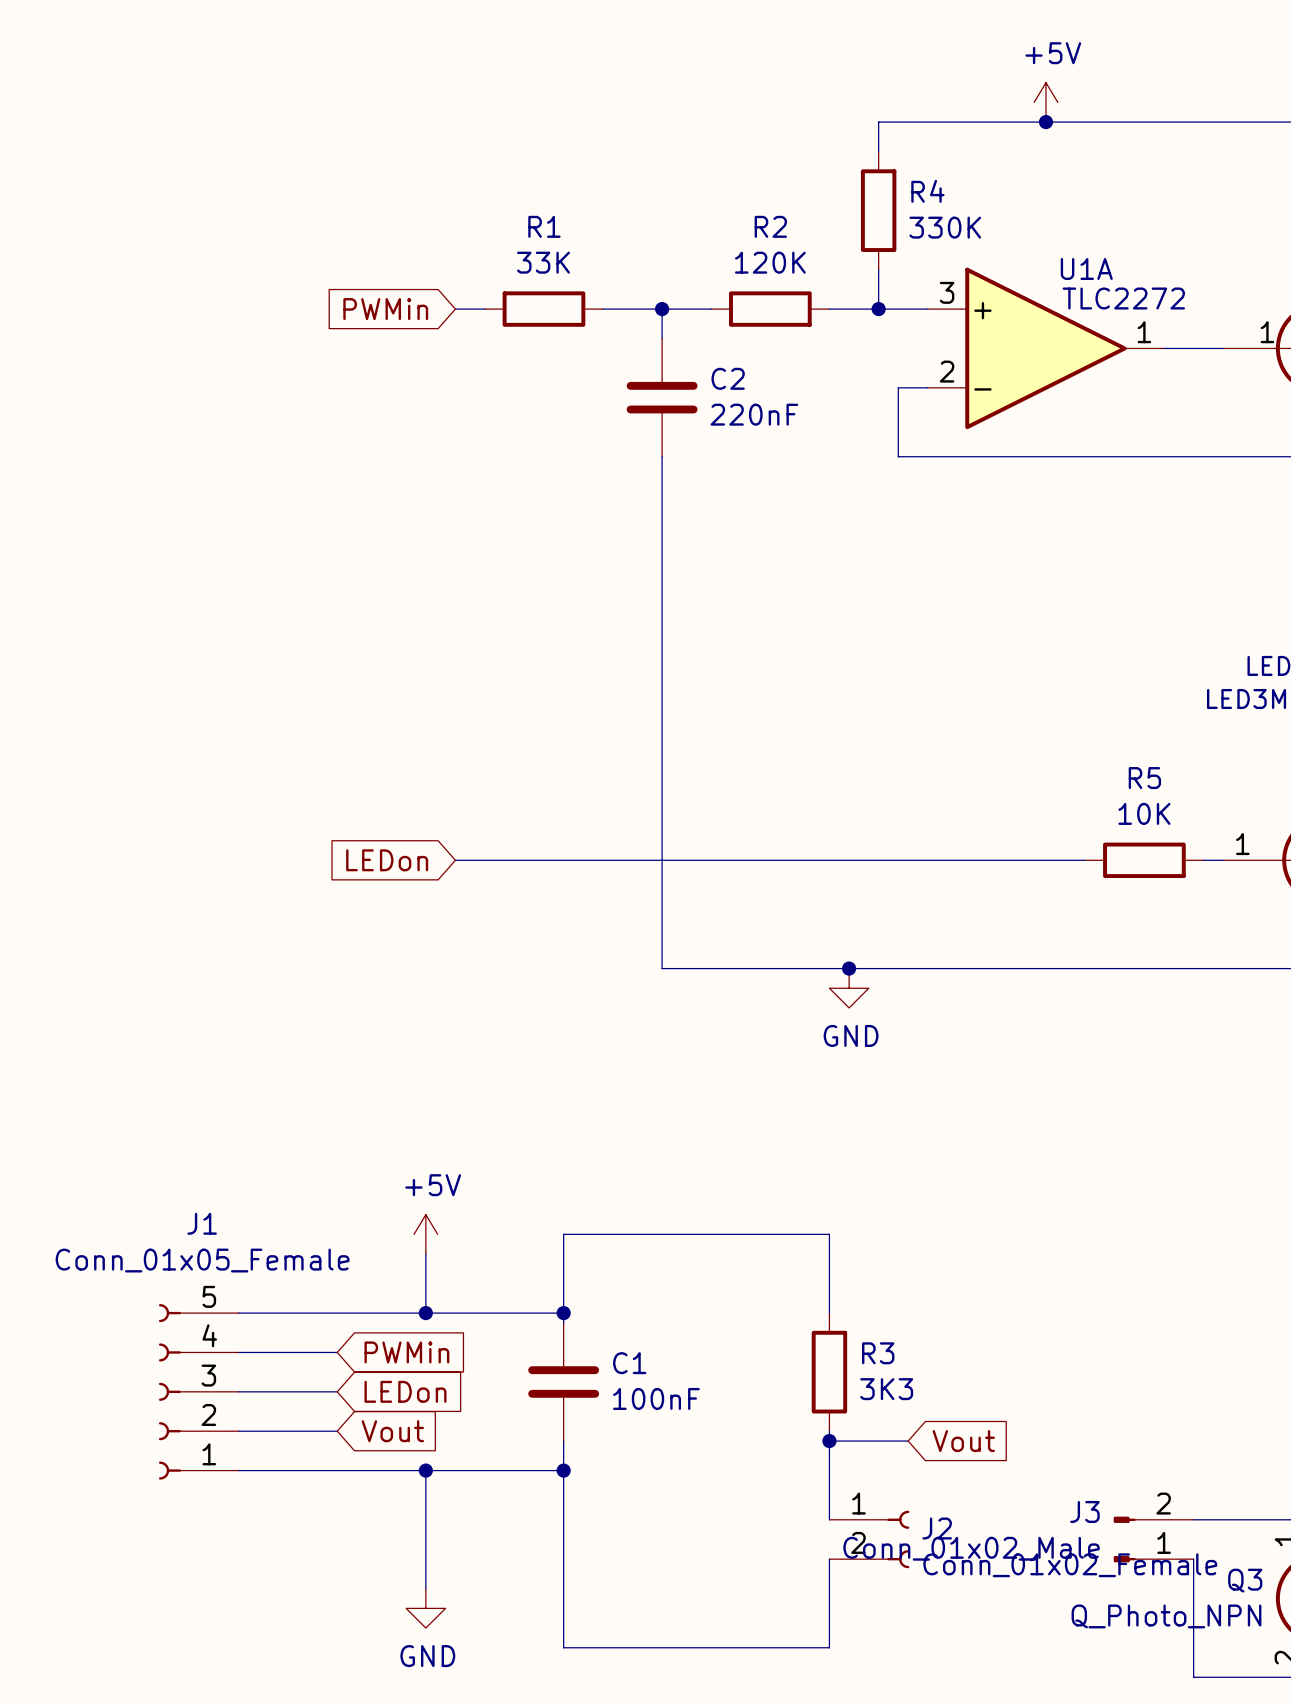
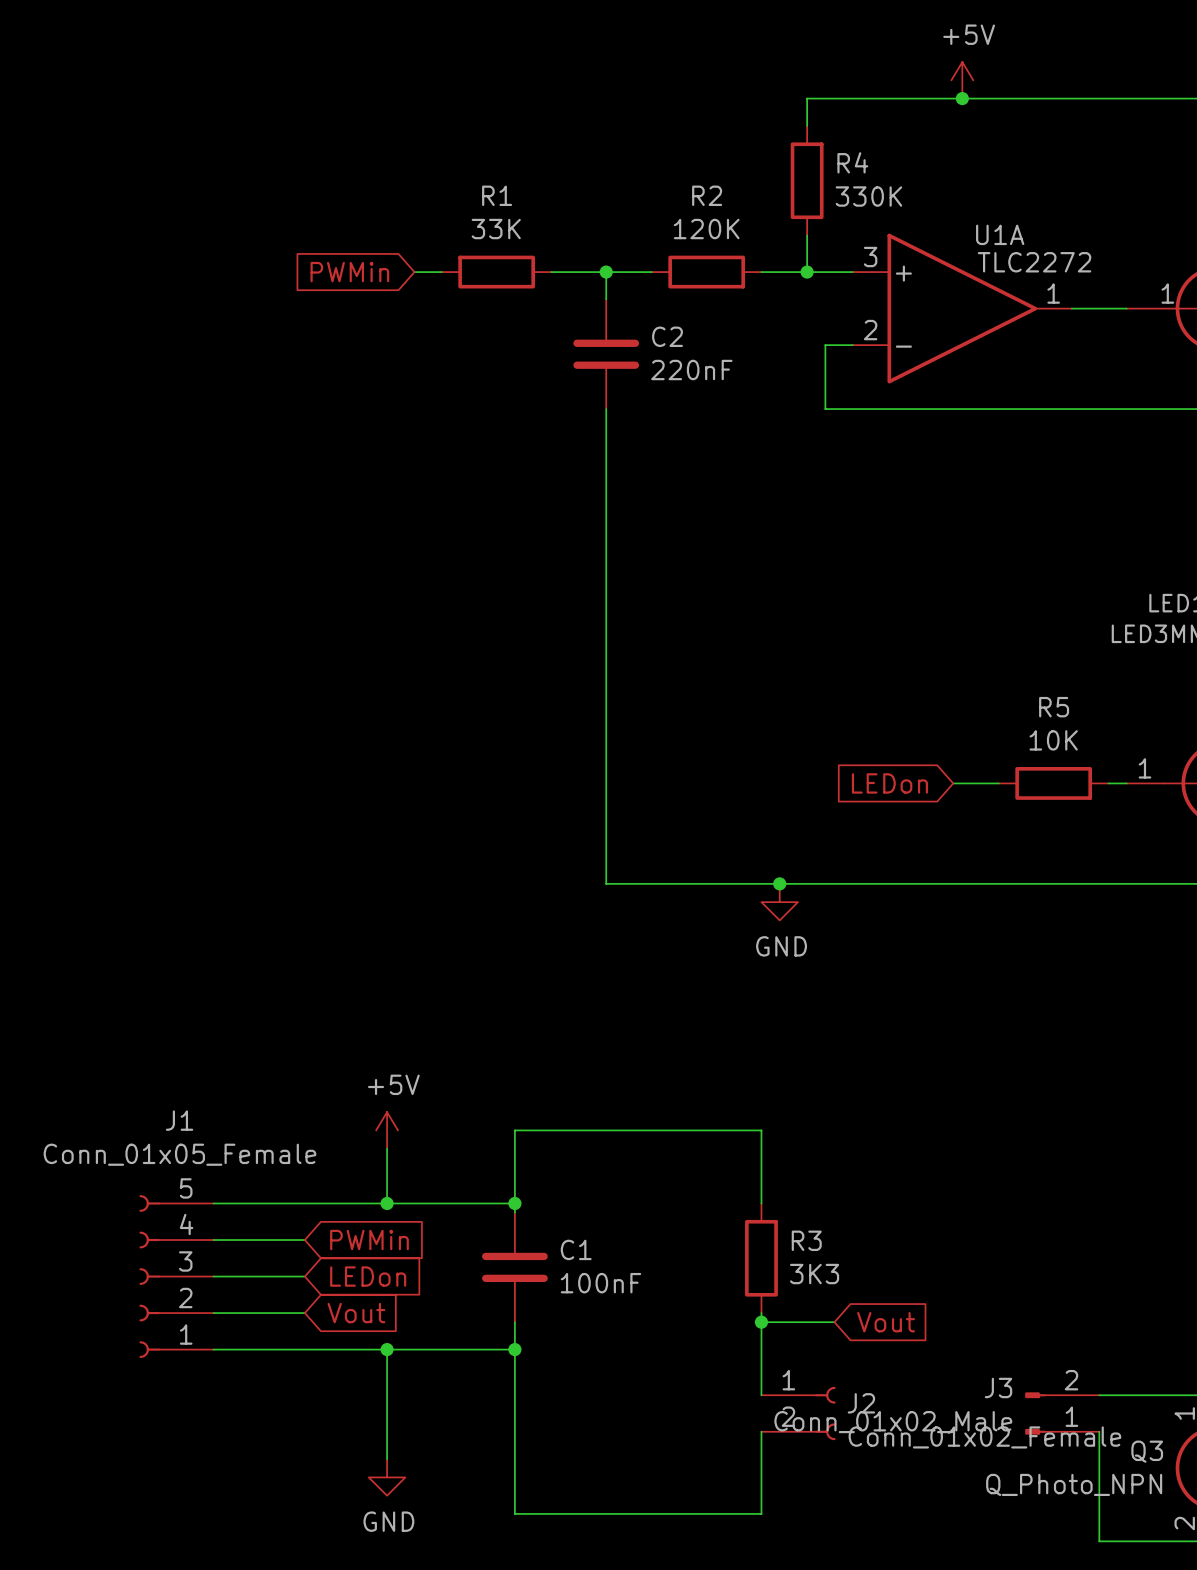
global label: LEDon (387, 860) -> none
wire: (455, 860) (1036, 860) -> none
global label: none -> LEDon (889, 783)

